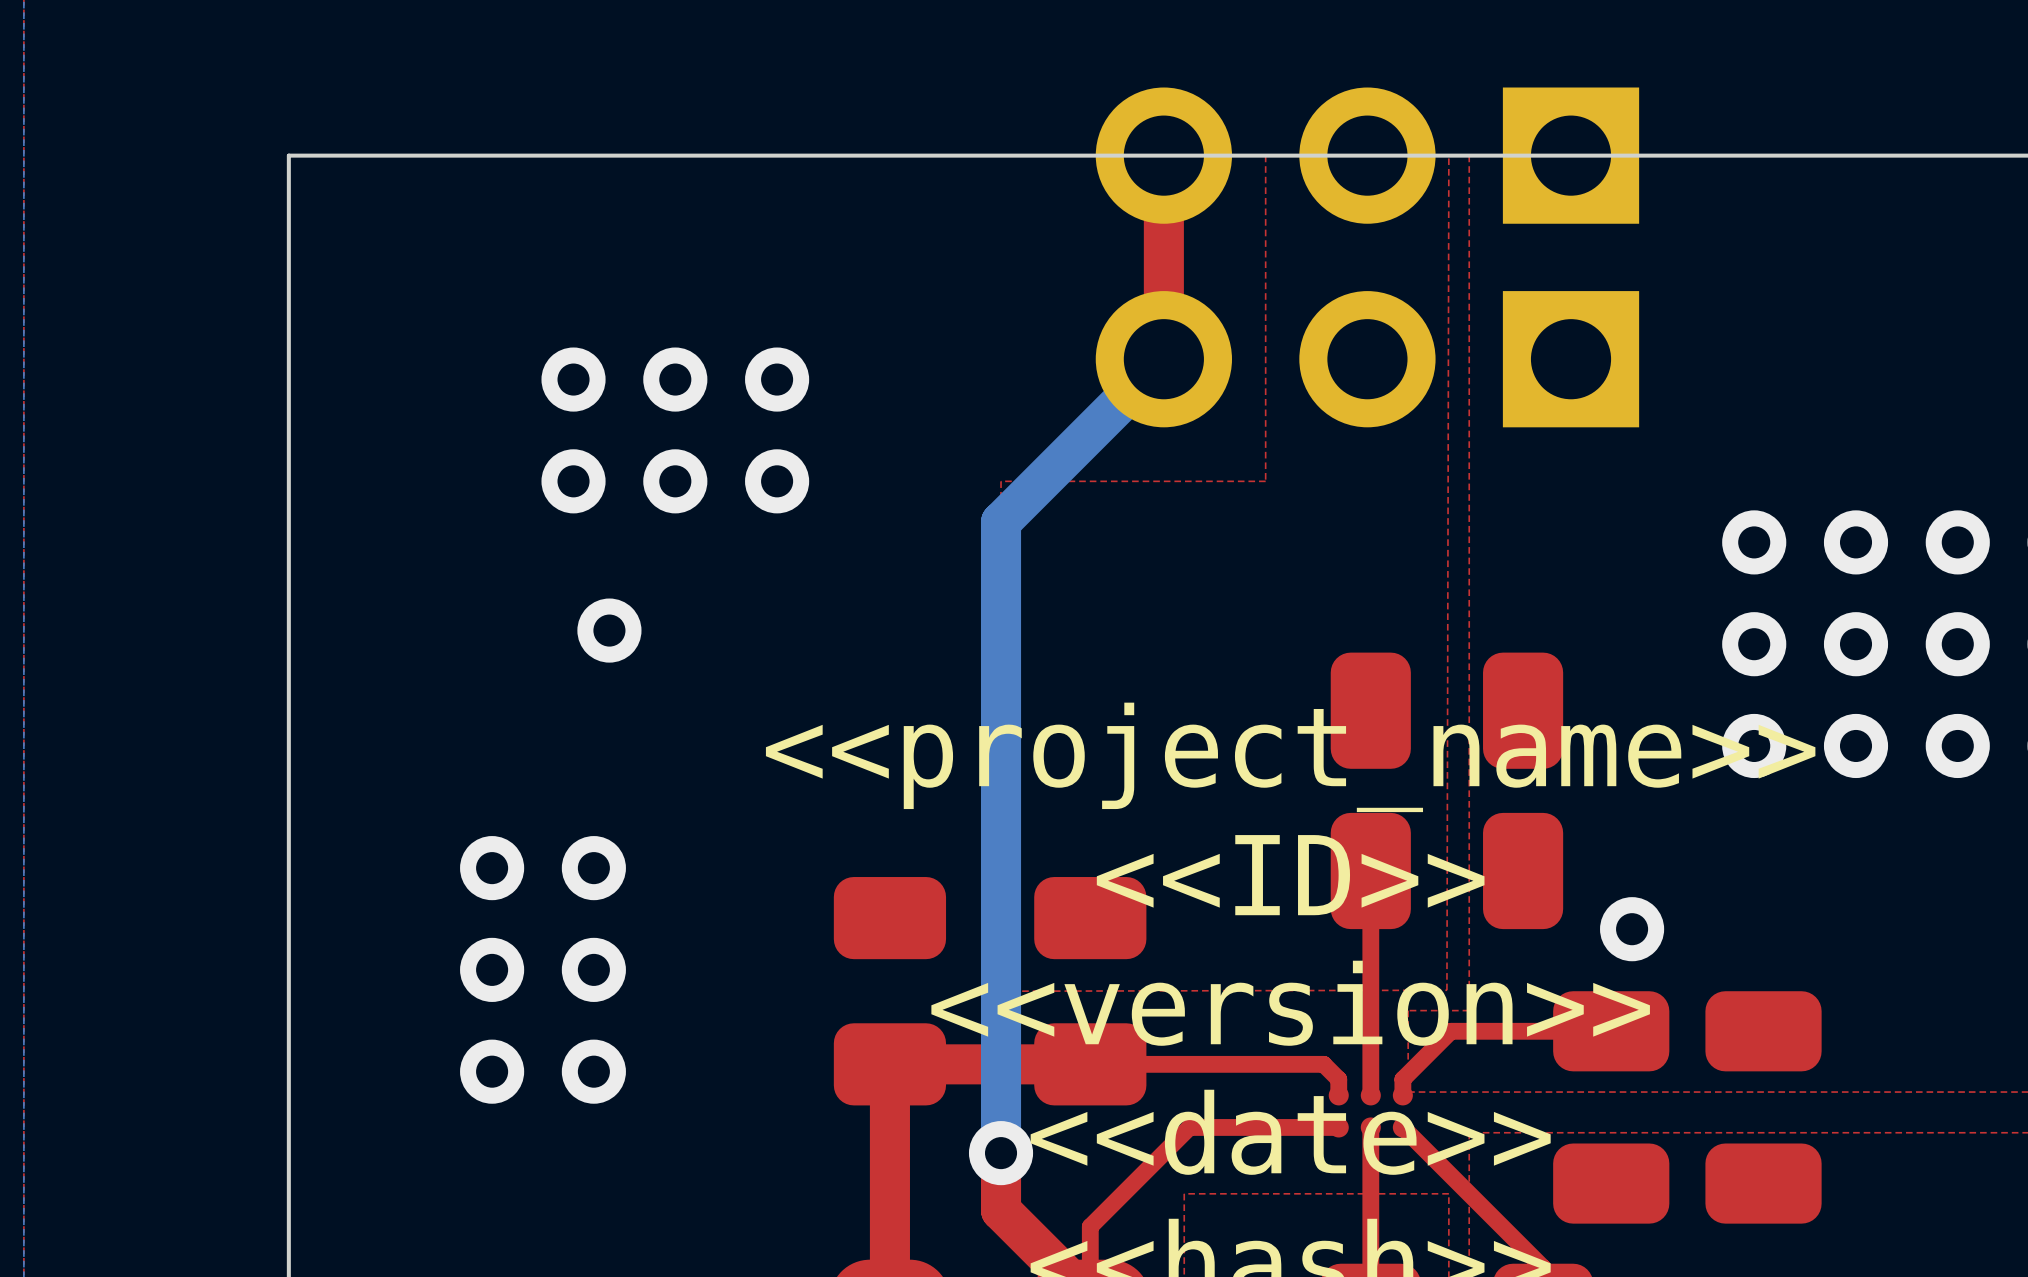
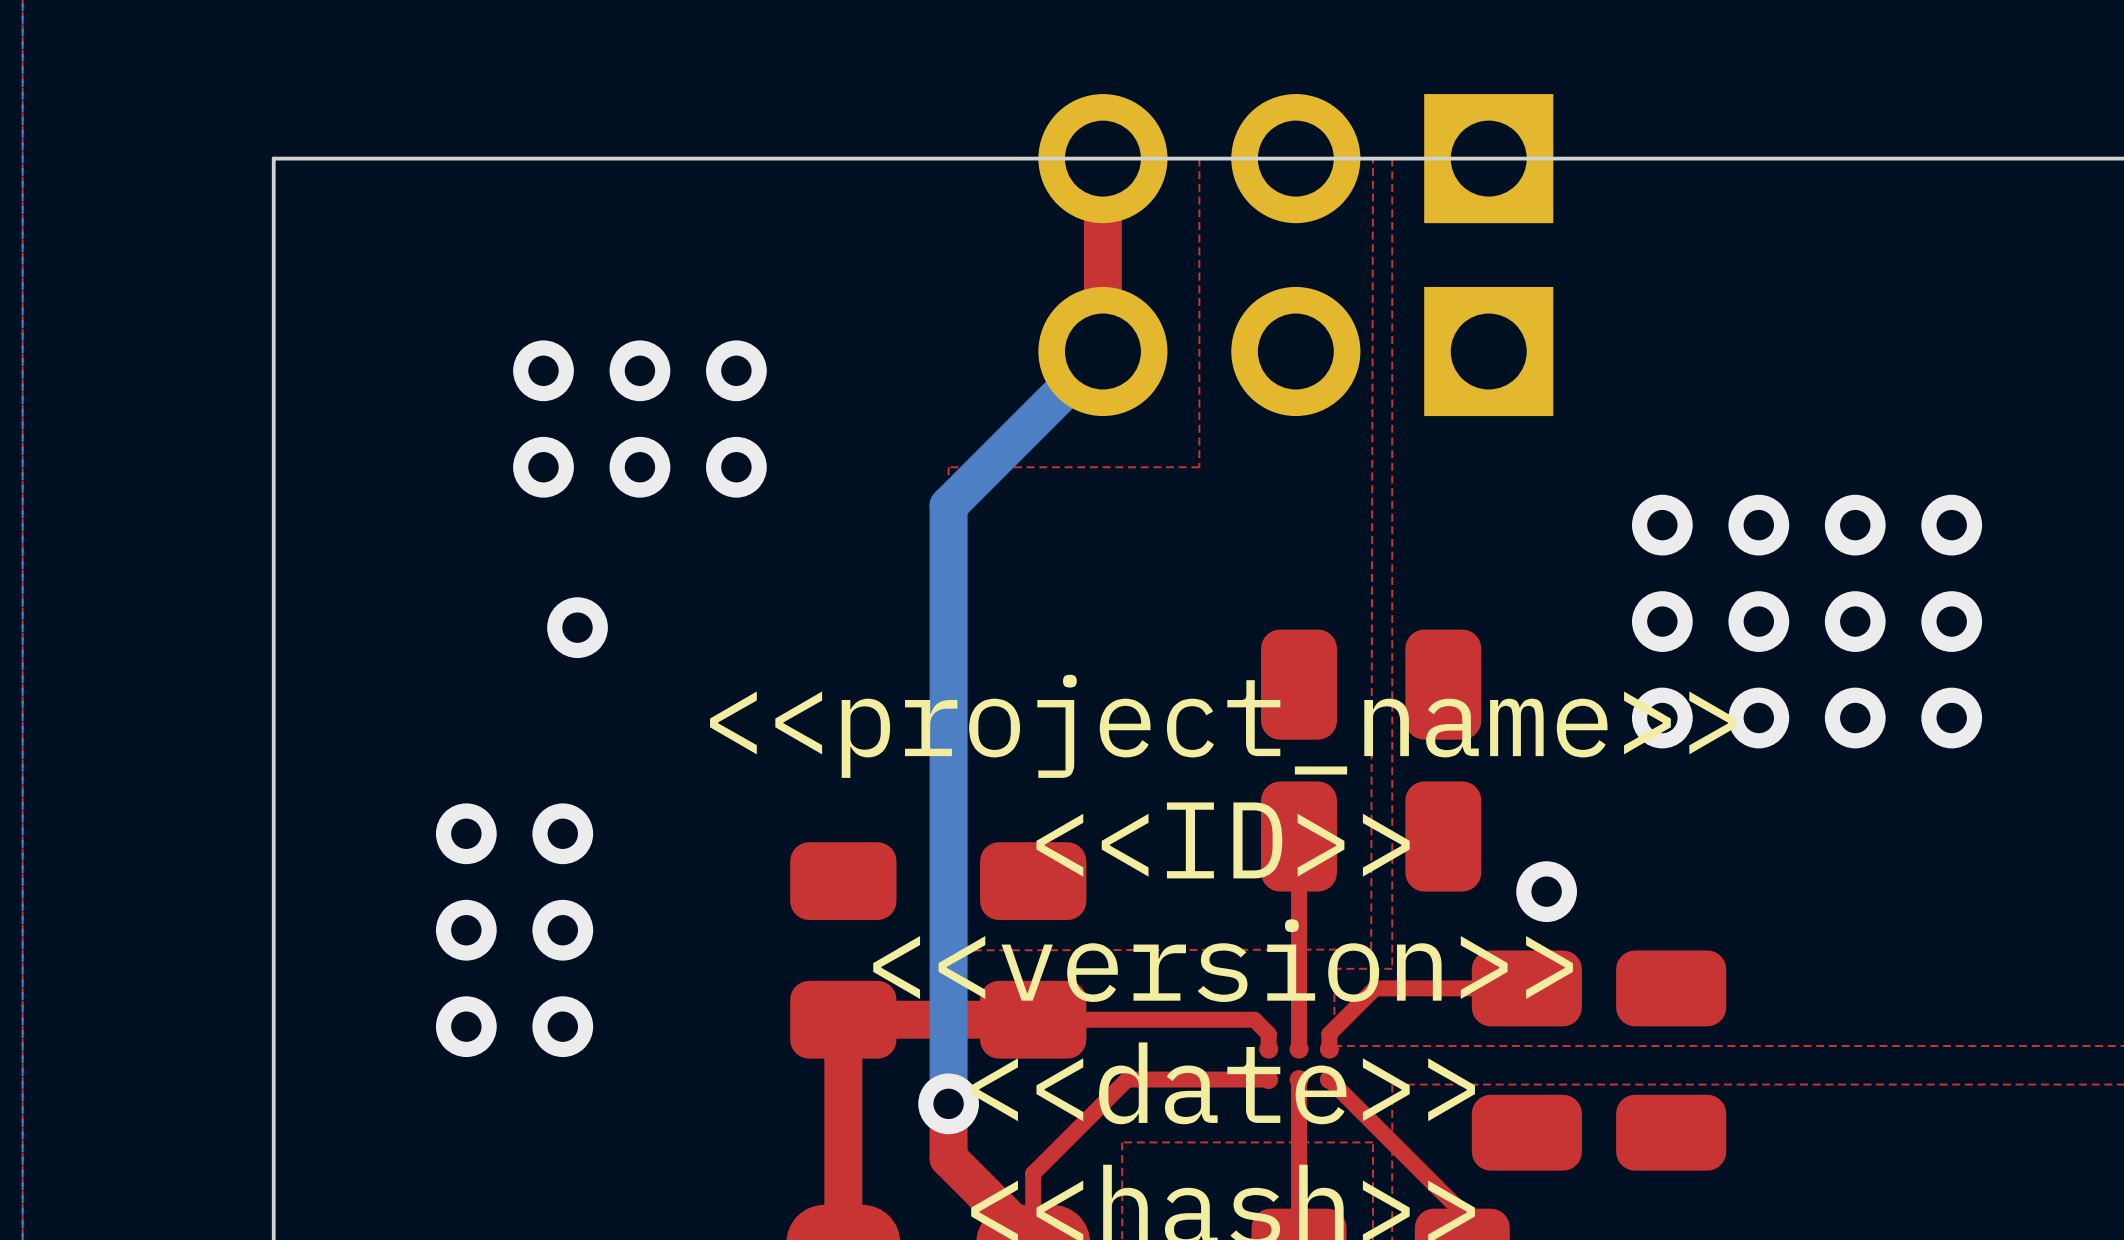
via position: (609, 630) -> (577, 627)

